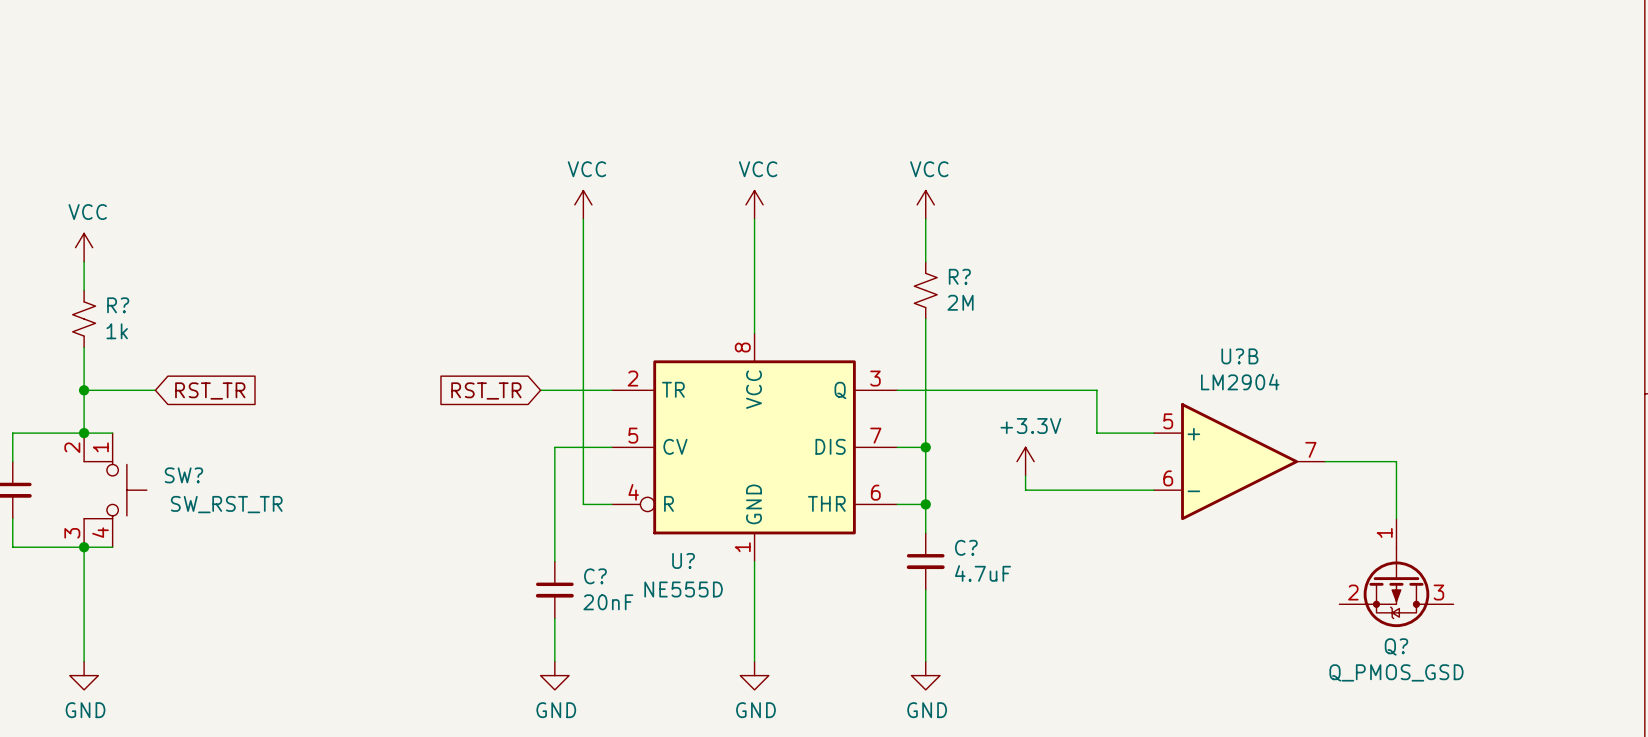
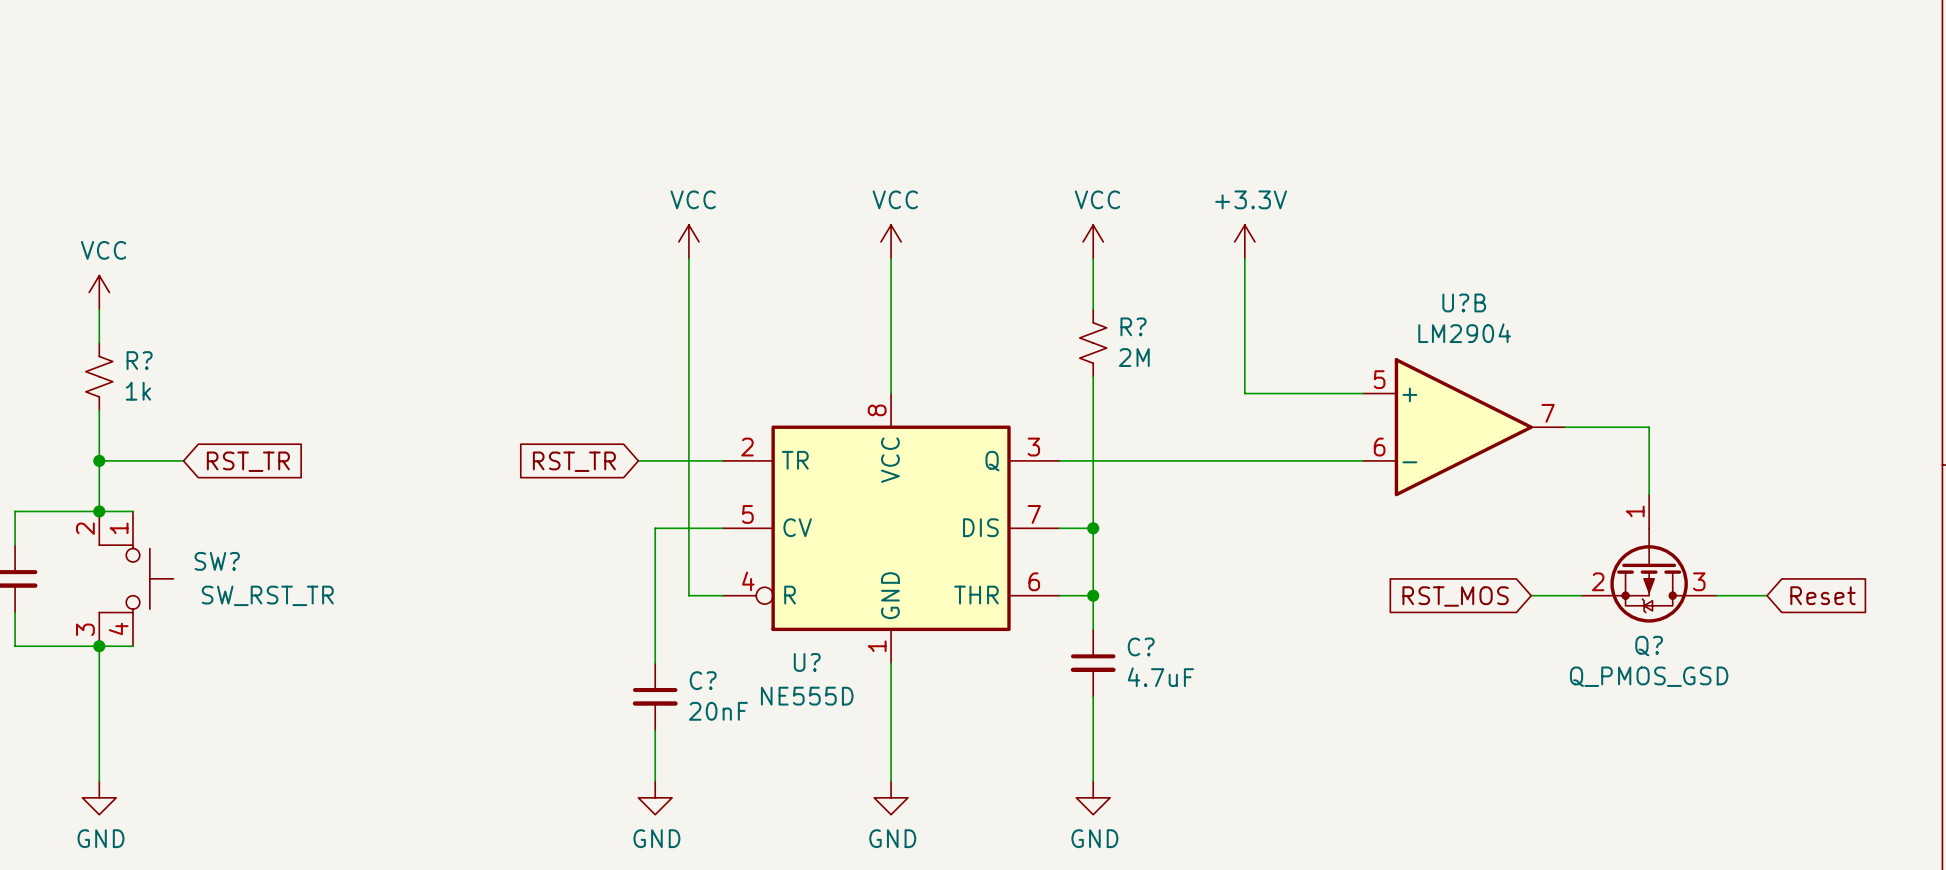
wire: none -> (1244, 258) (1244, 393) (1362, 393)
wire: (1096, 390) (1096, 433) (1153, 433) -> (1295, 460) (1362, 460)
power symbol position: +3.3V (1025, 461) -> +3.3V (1244, 241)
U?B position: (1239, 461) -> (1463, 427)
wire: (1325, 461) (1396, 461) (1396, 518) -> (1564, 427) (1649, 427) (1649, 494)
wire: (1025, 475) (1025, 490) (1153, 490) -> none
wire: none -> (1531, 595) (1581, 595)
wire: none -> (1716, 595) (1767, 595)
global label: none -> Reset (1823, 595)
global label: none -> RST_MOS (1455, 596)
Q? position: (1396, 572) -> (1649, 558)

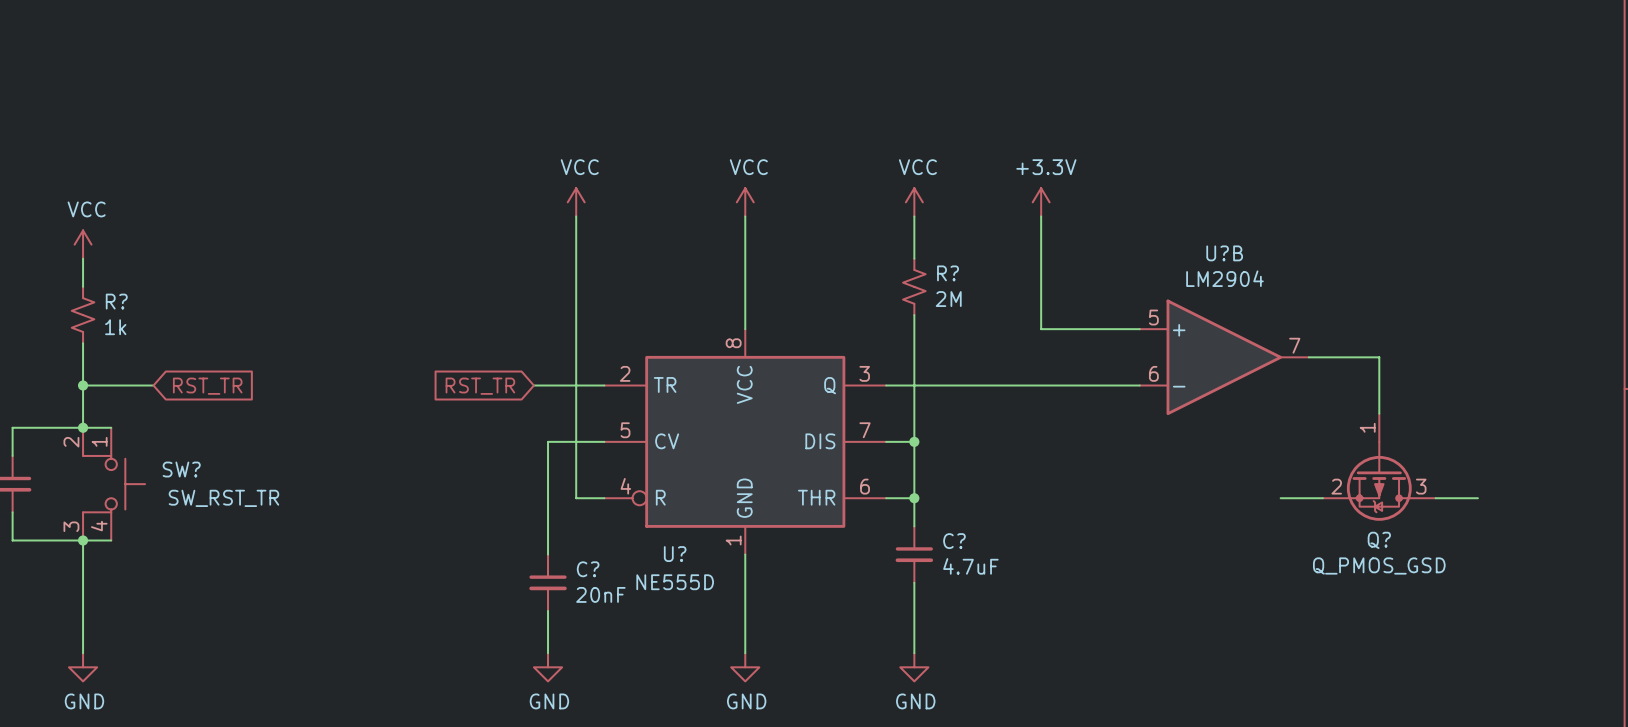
global label: Reset (1823, 595) -> none
global label: RST_MOS (1455, 596) -> none

